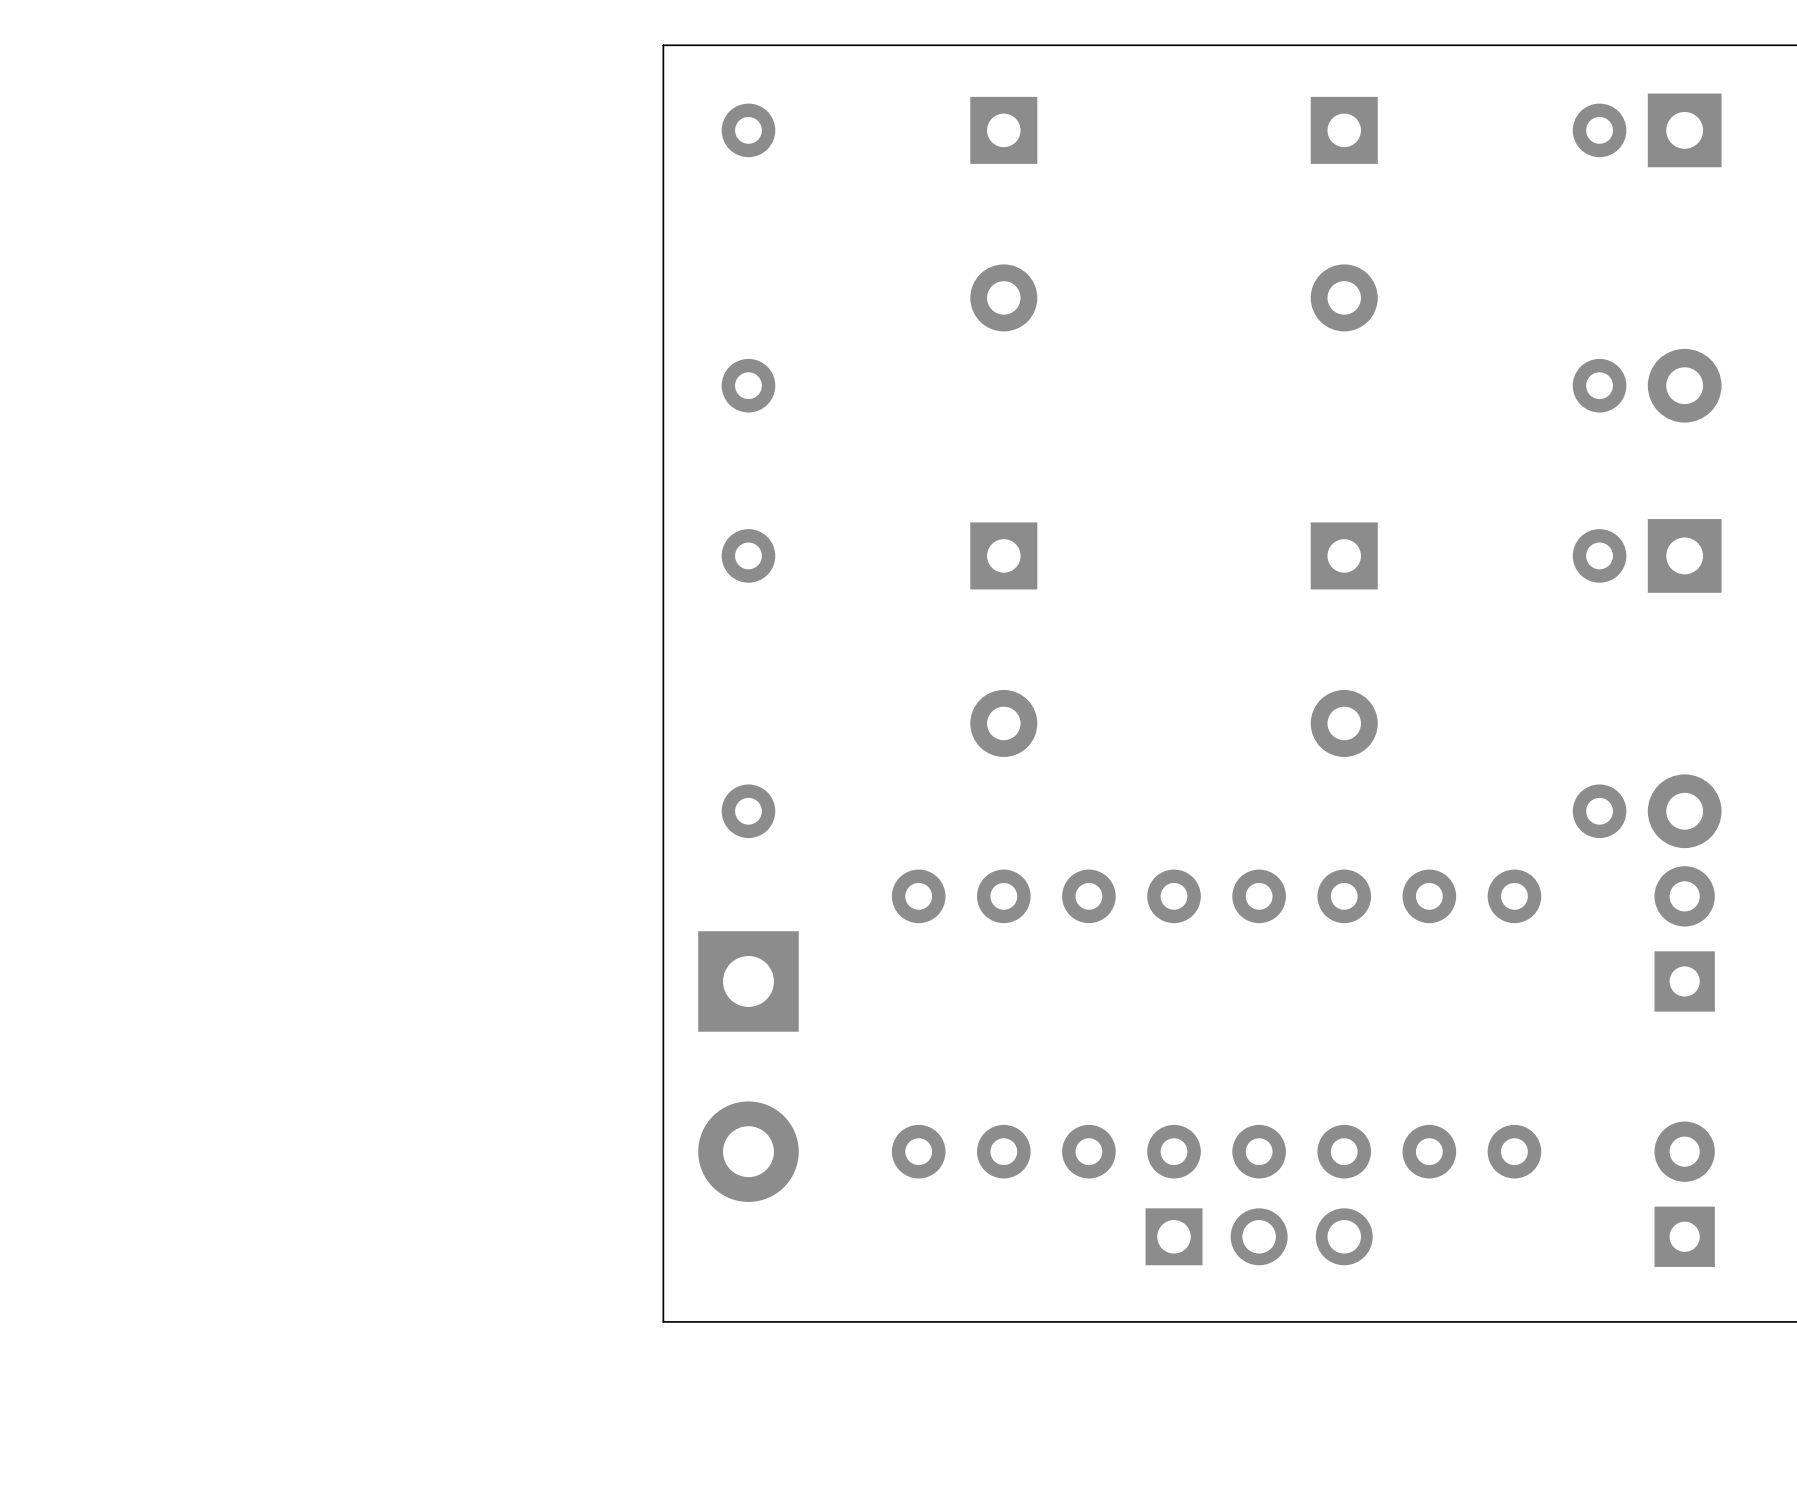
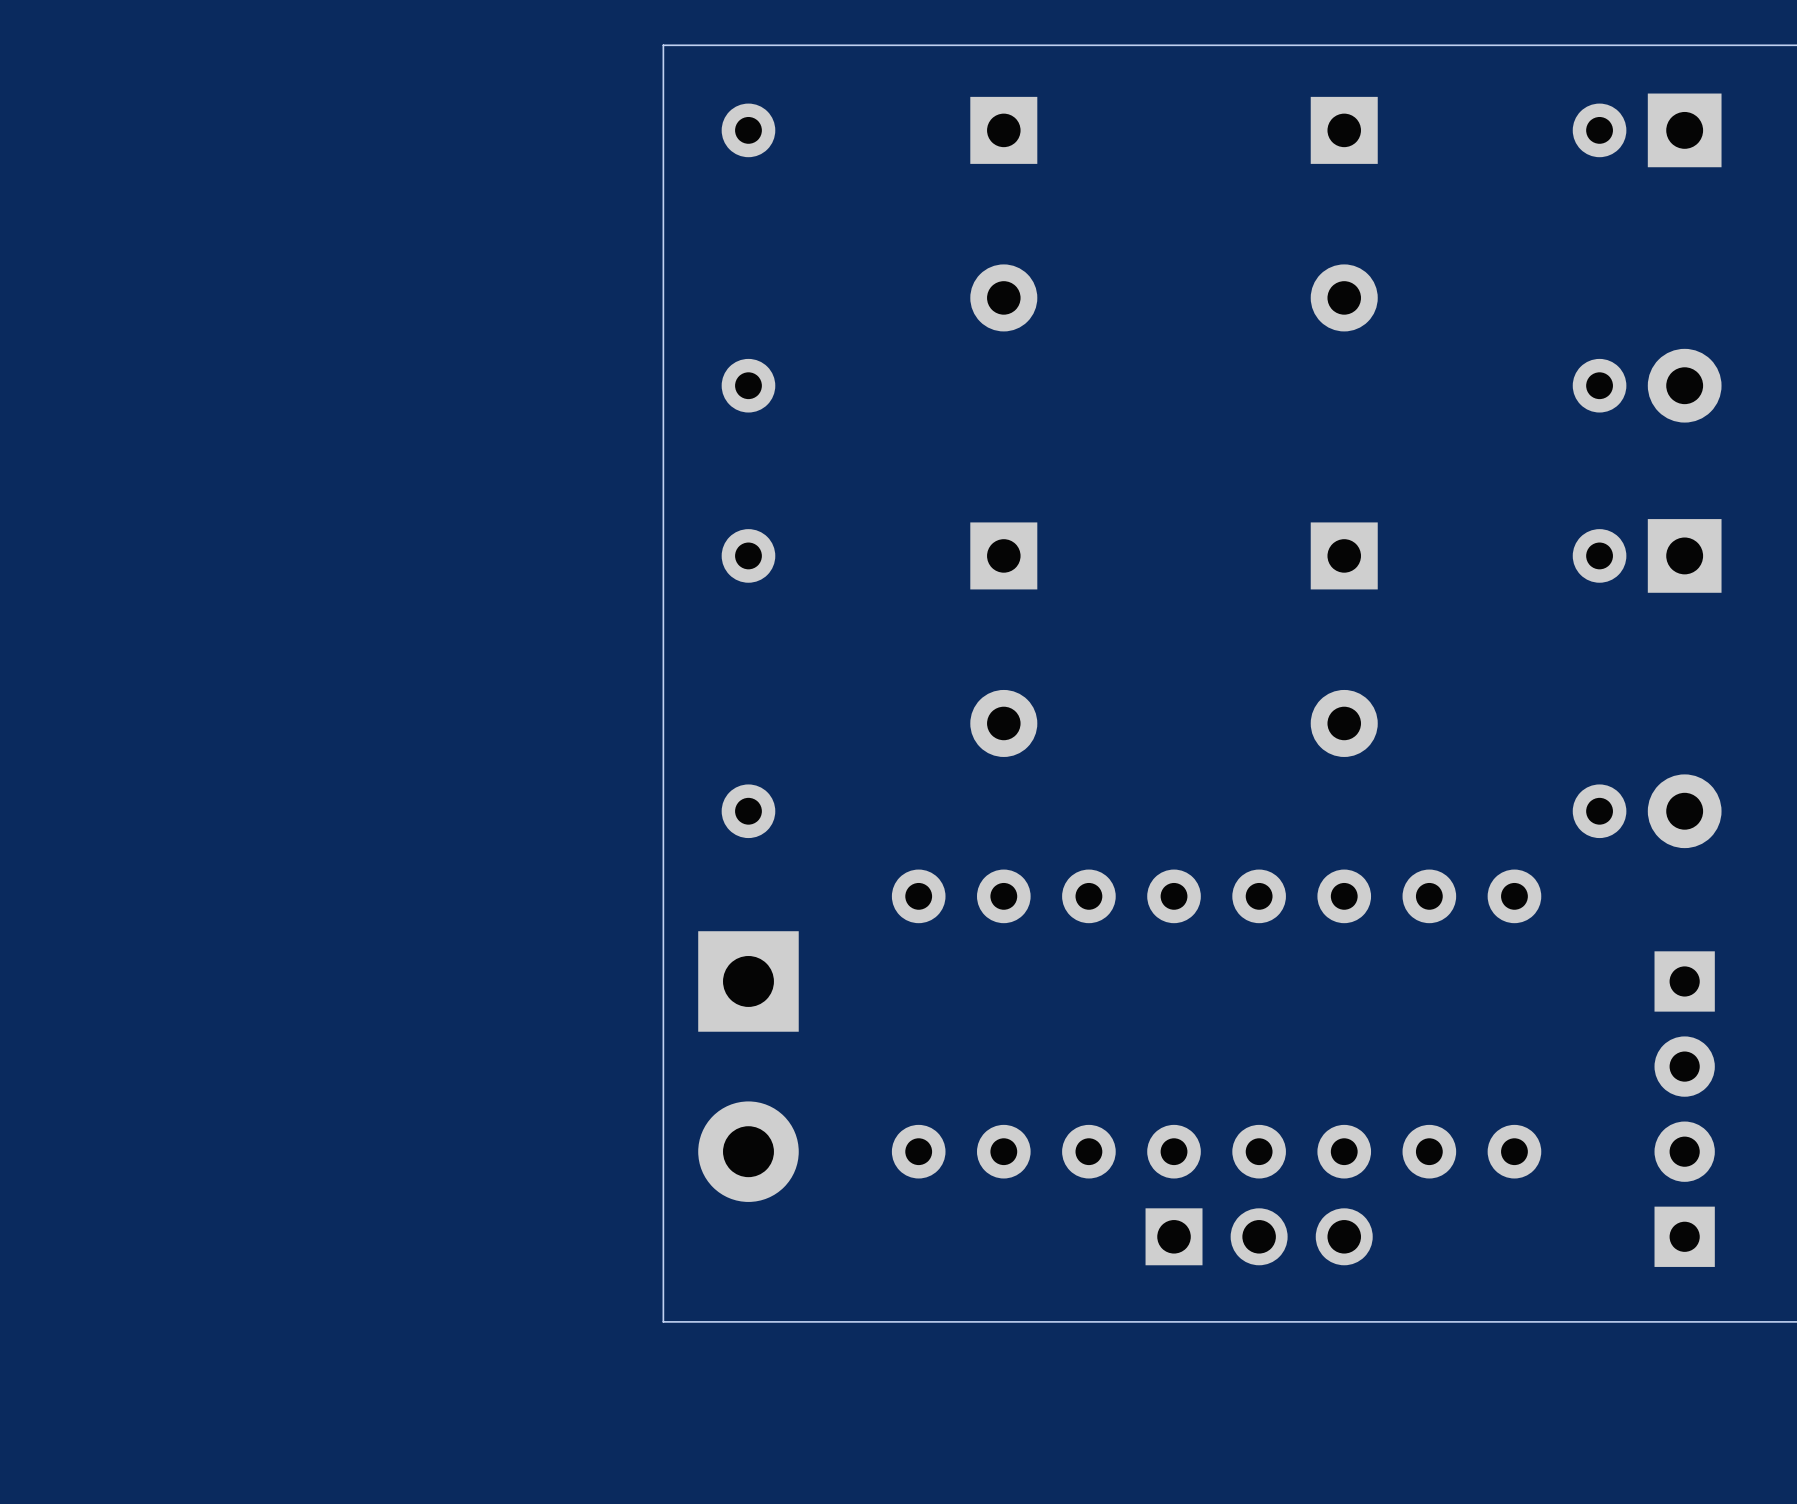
part rotation: 0° (1684, 938) -> 180° (1684, 1024)

